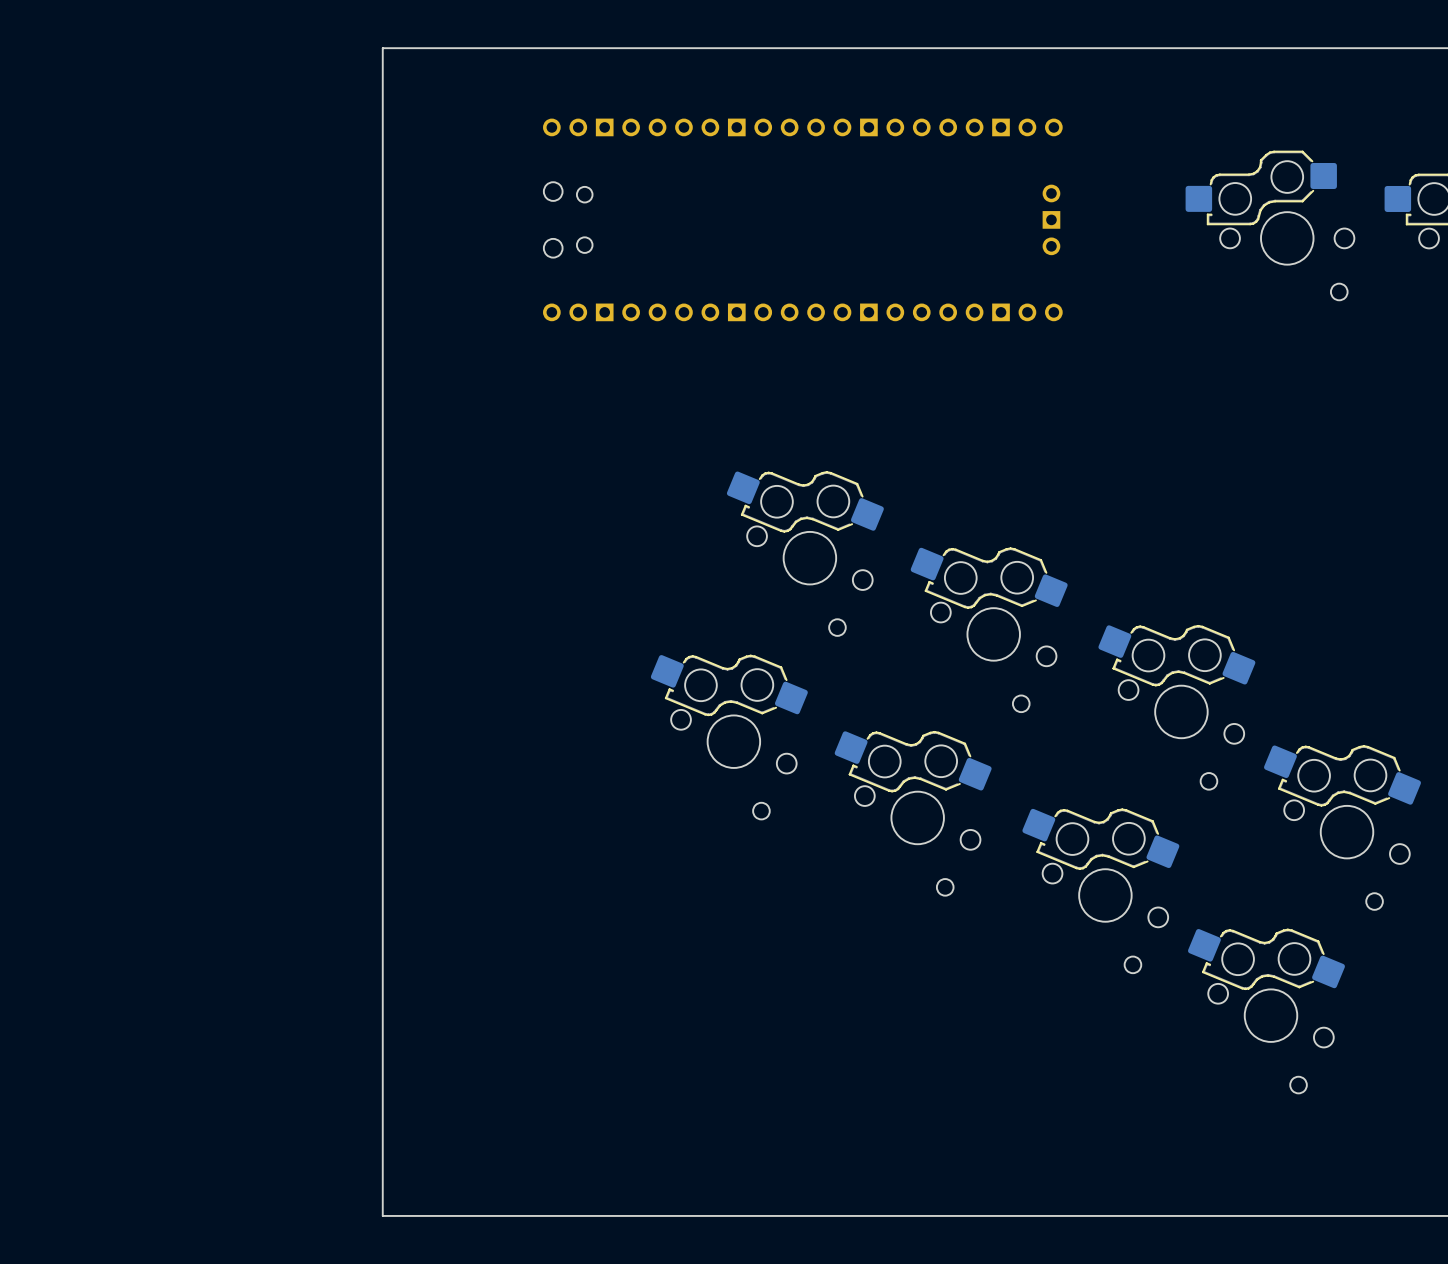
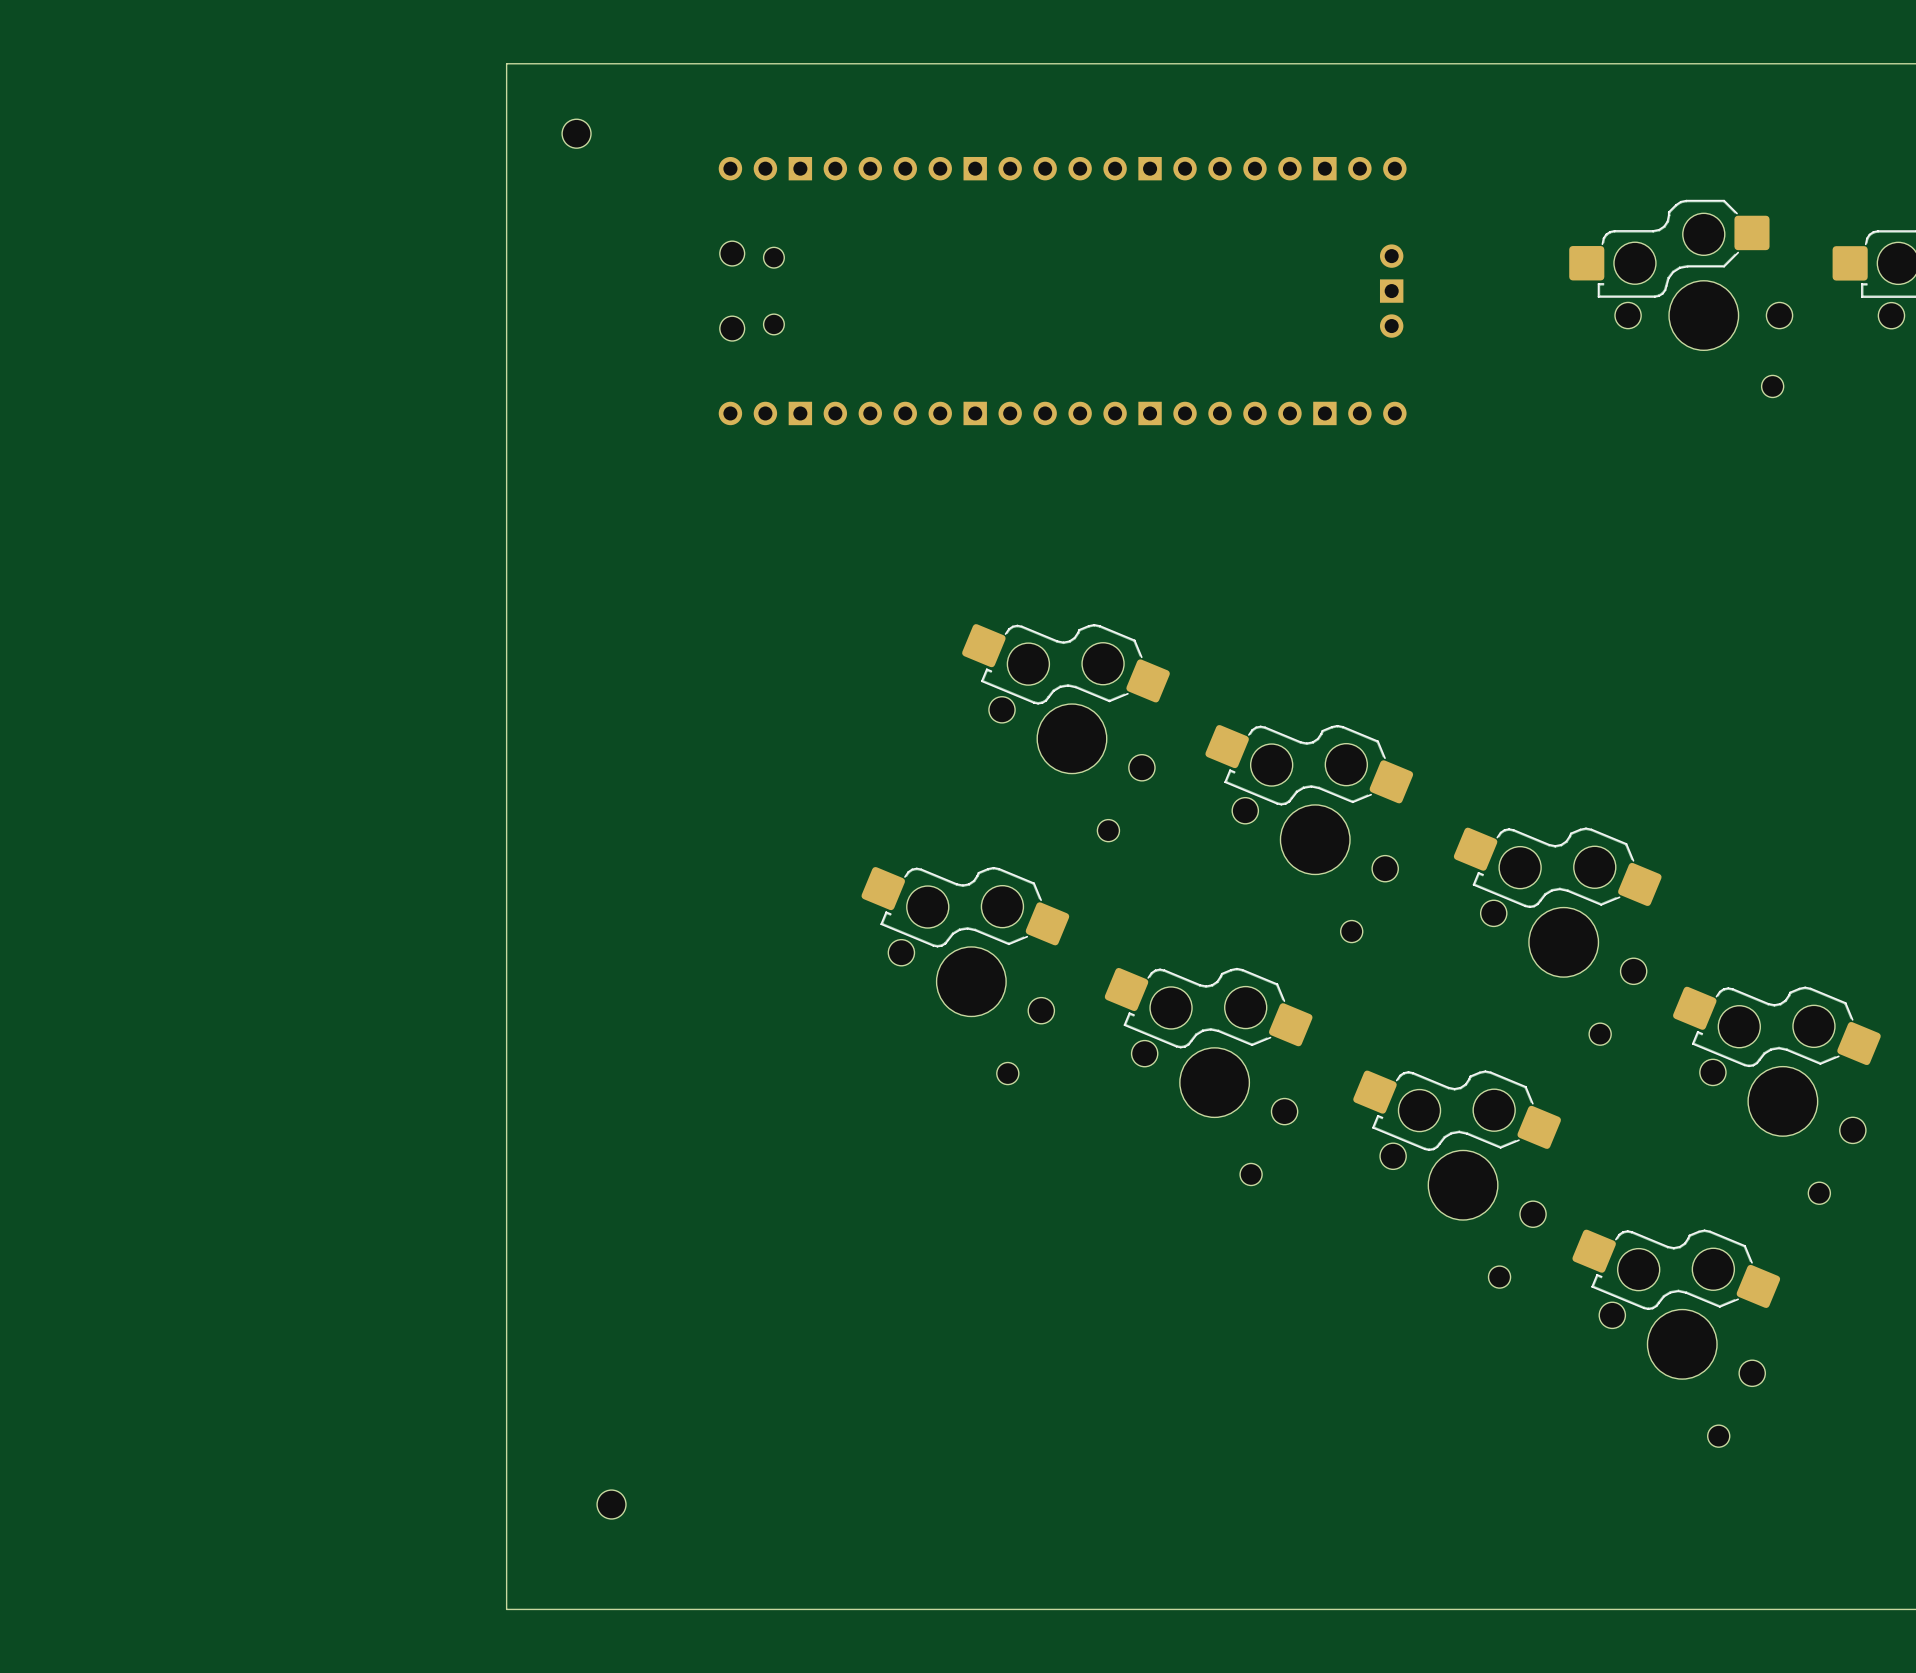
part: none -> (576, 133)
part: none -> (611, 1504)

